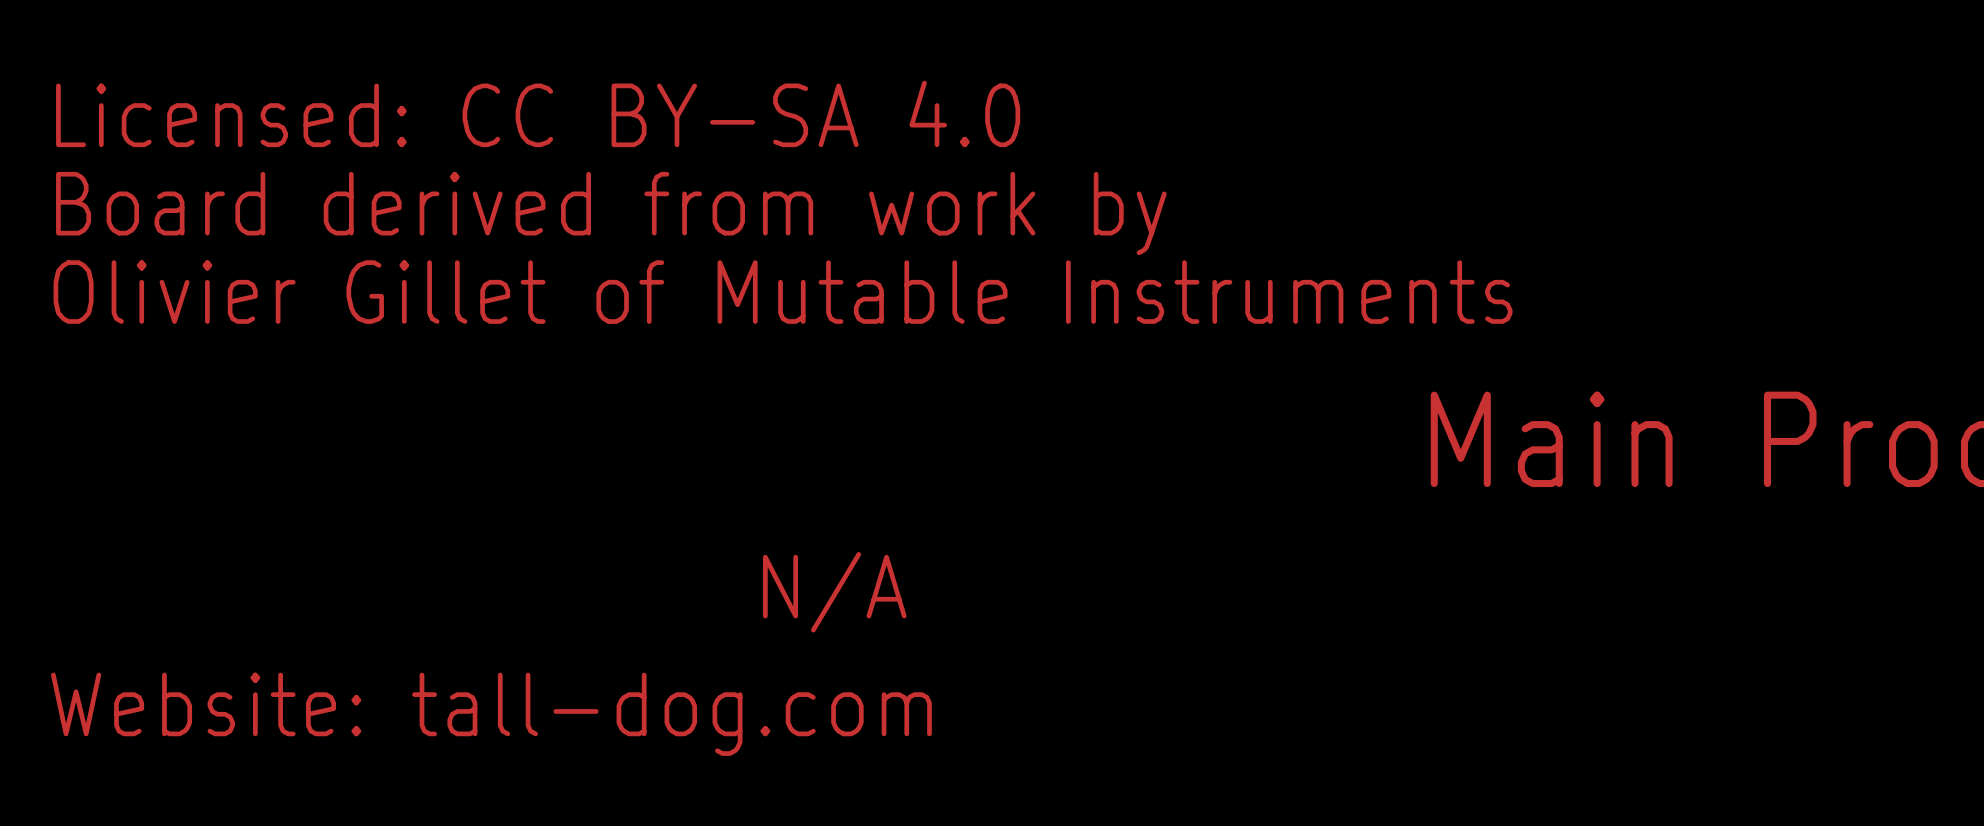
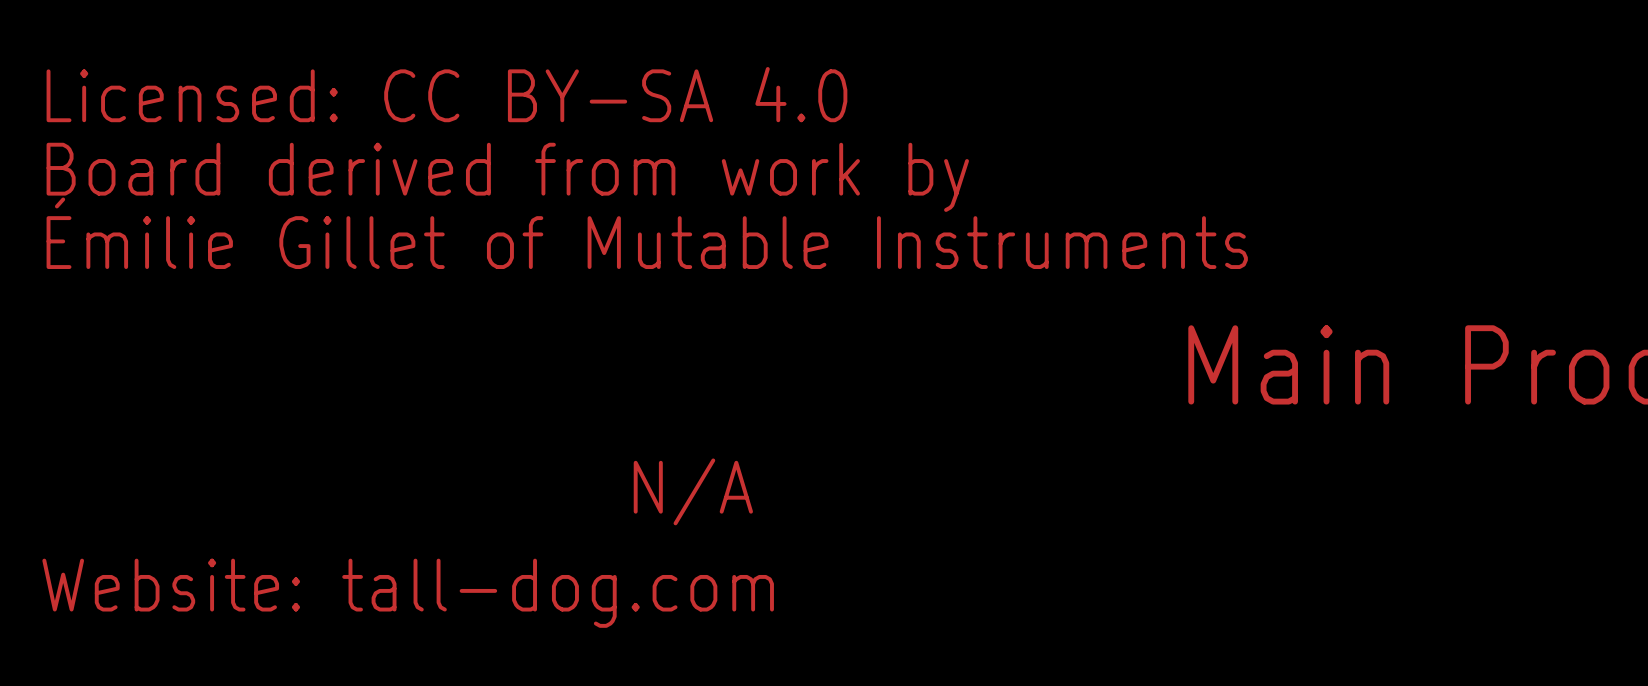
text: Olivier Gillet of Mutable Instruments (783, 292) -> Émilie Gillet of Mutable Instruments (647, 233)

